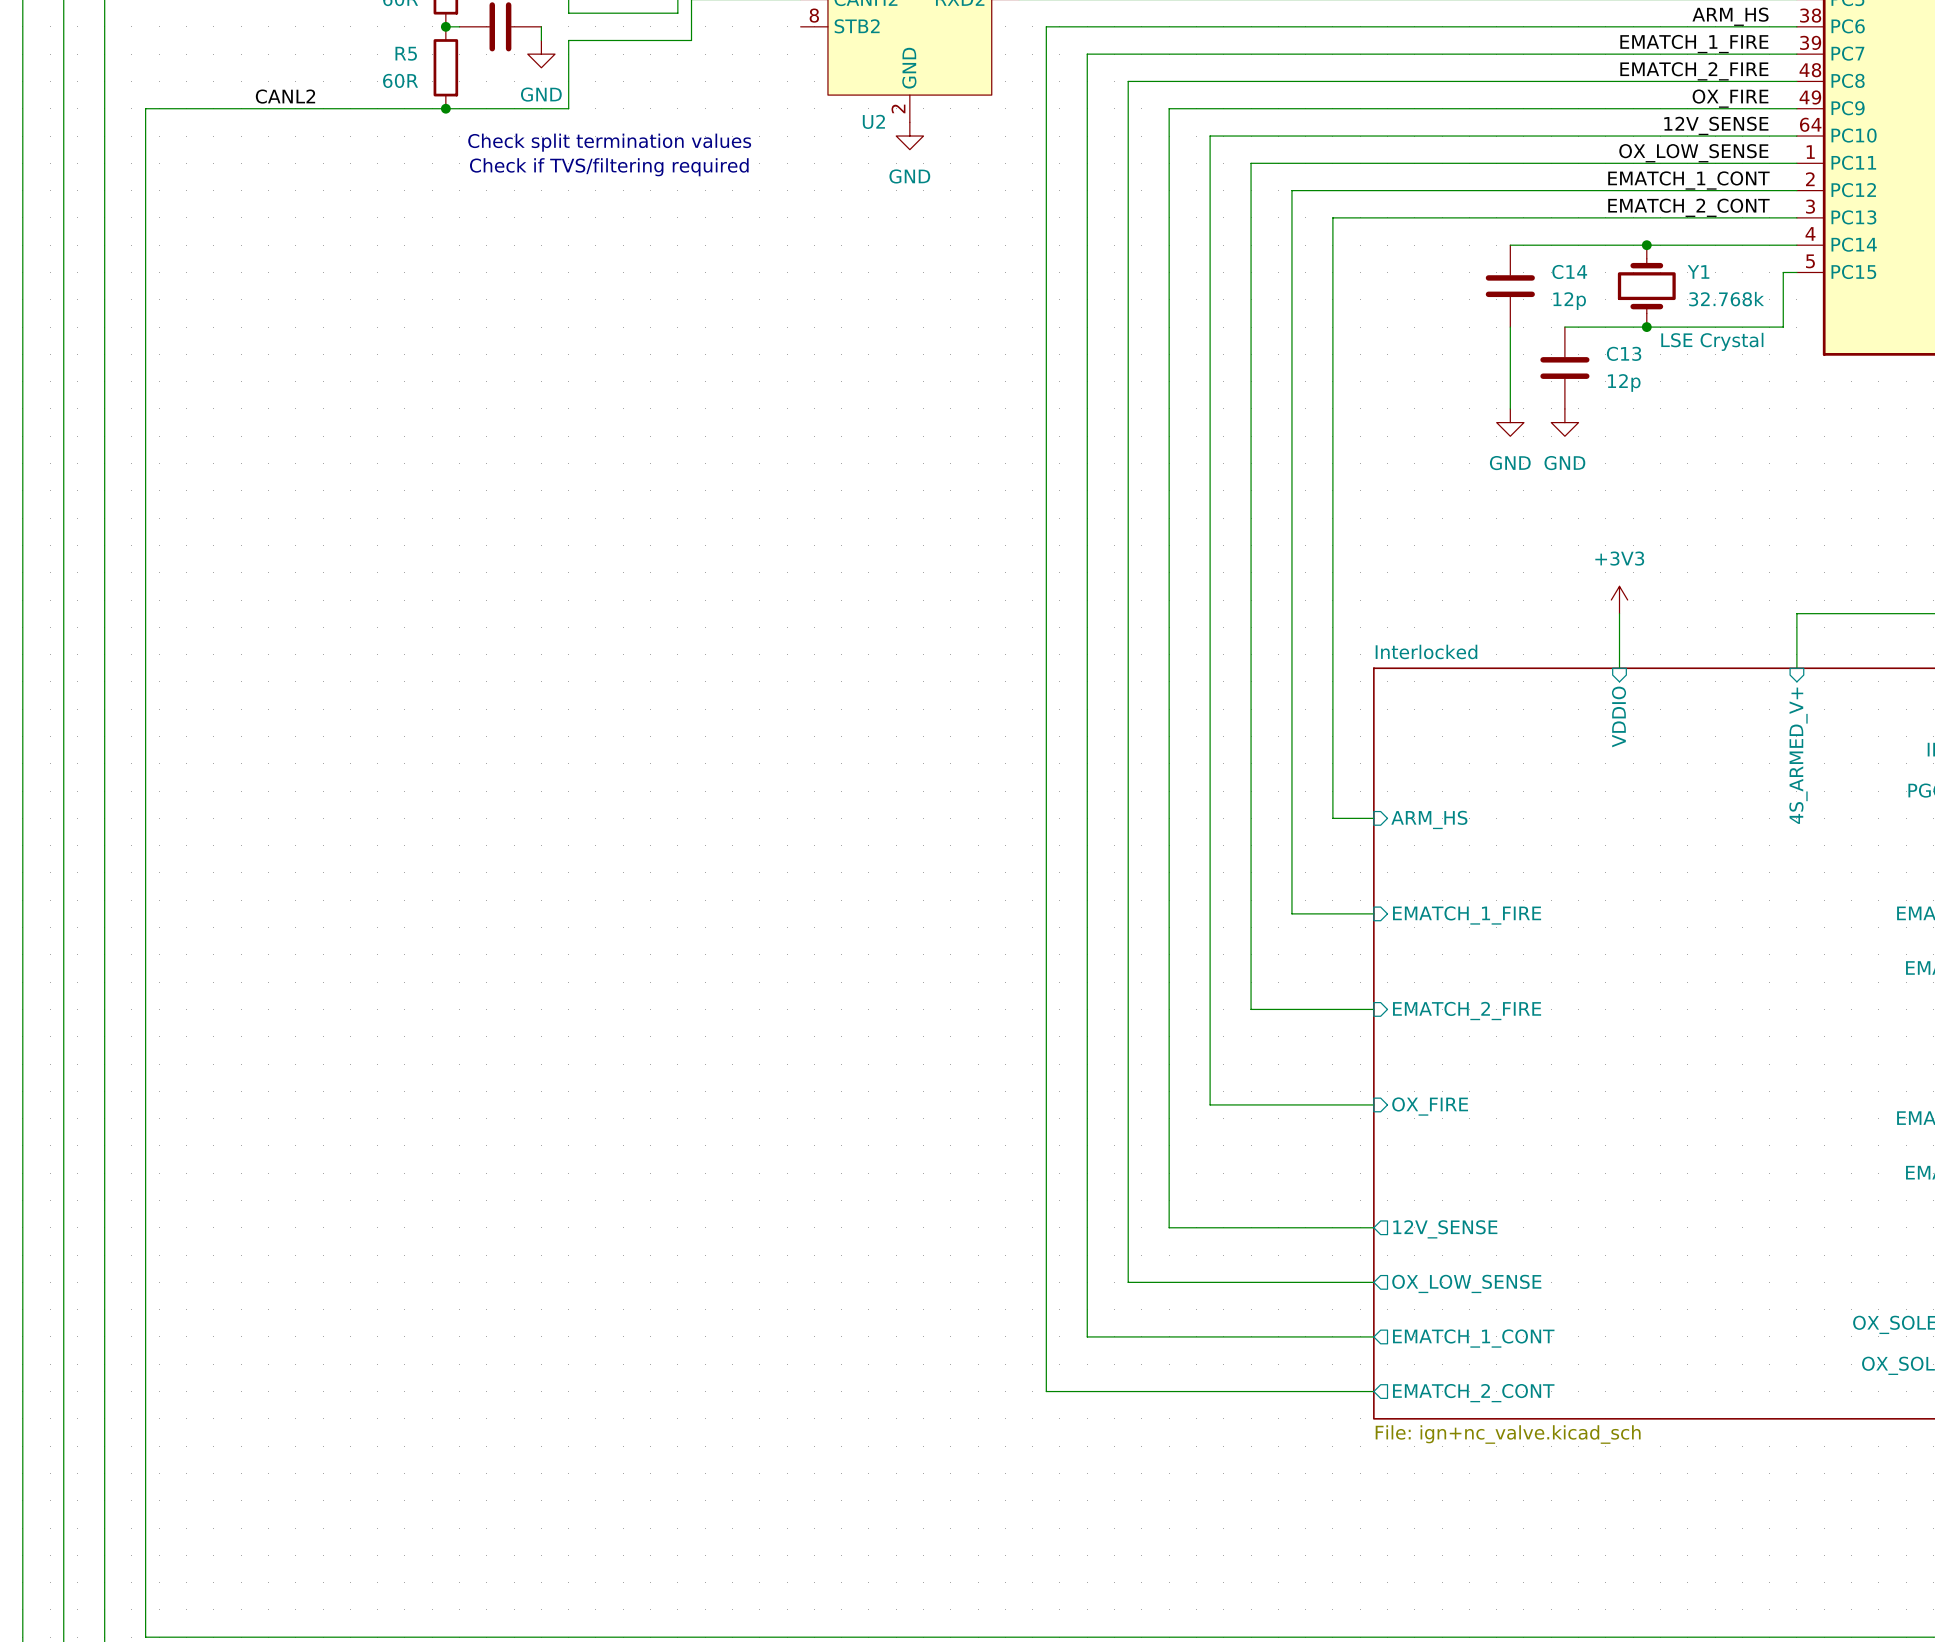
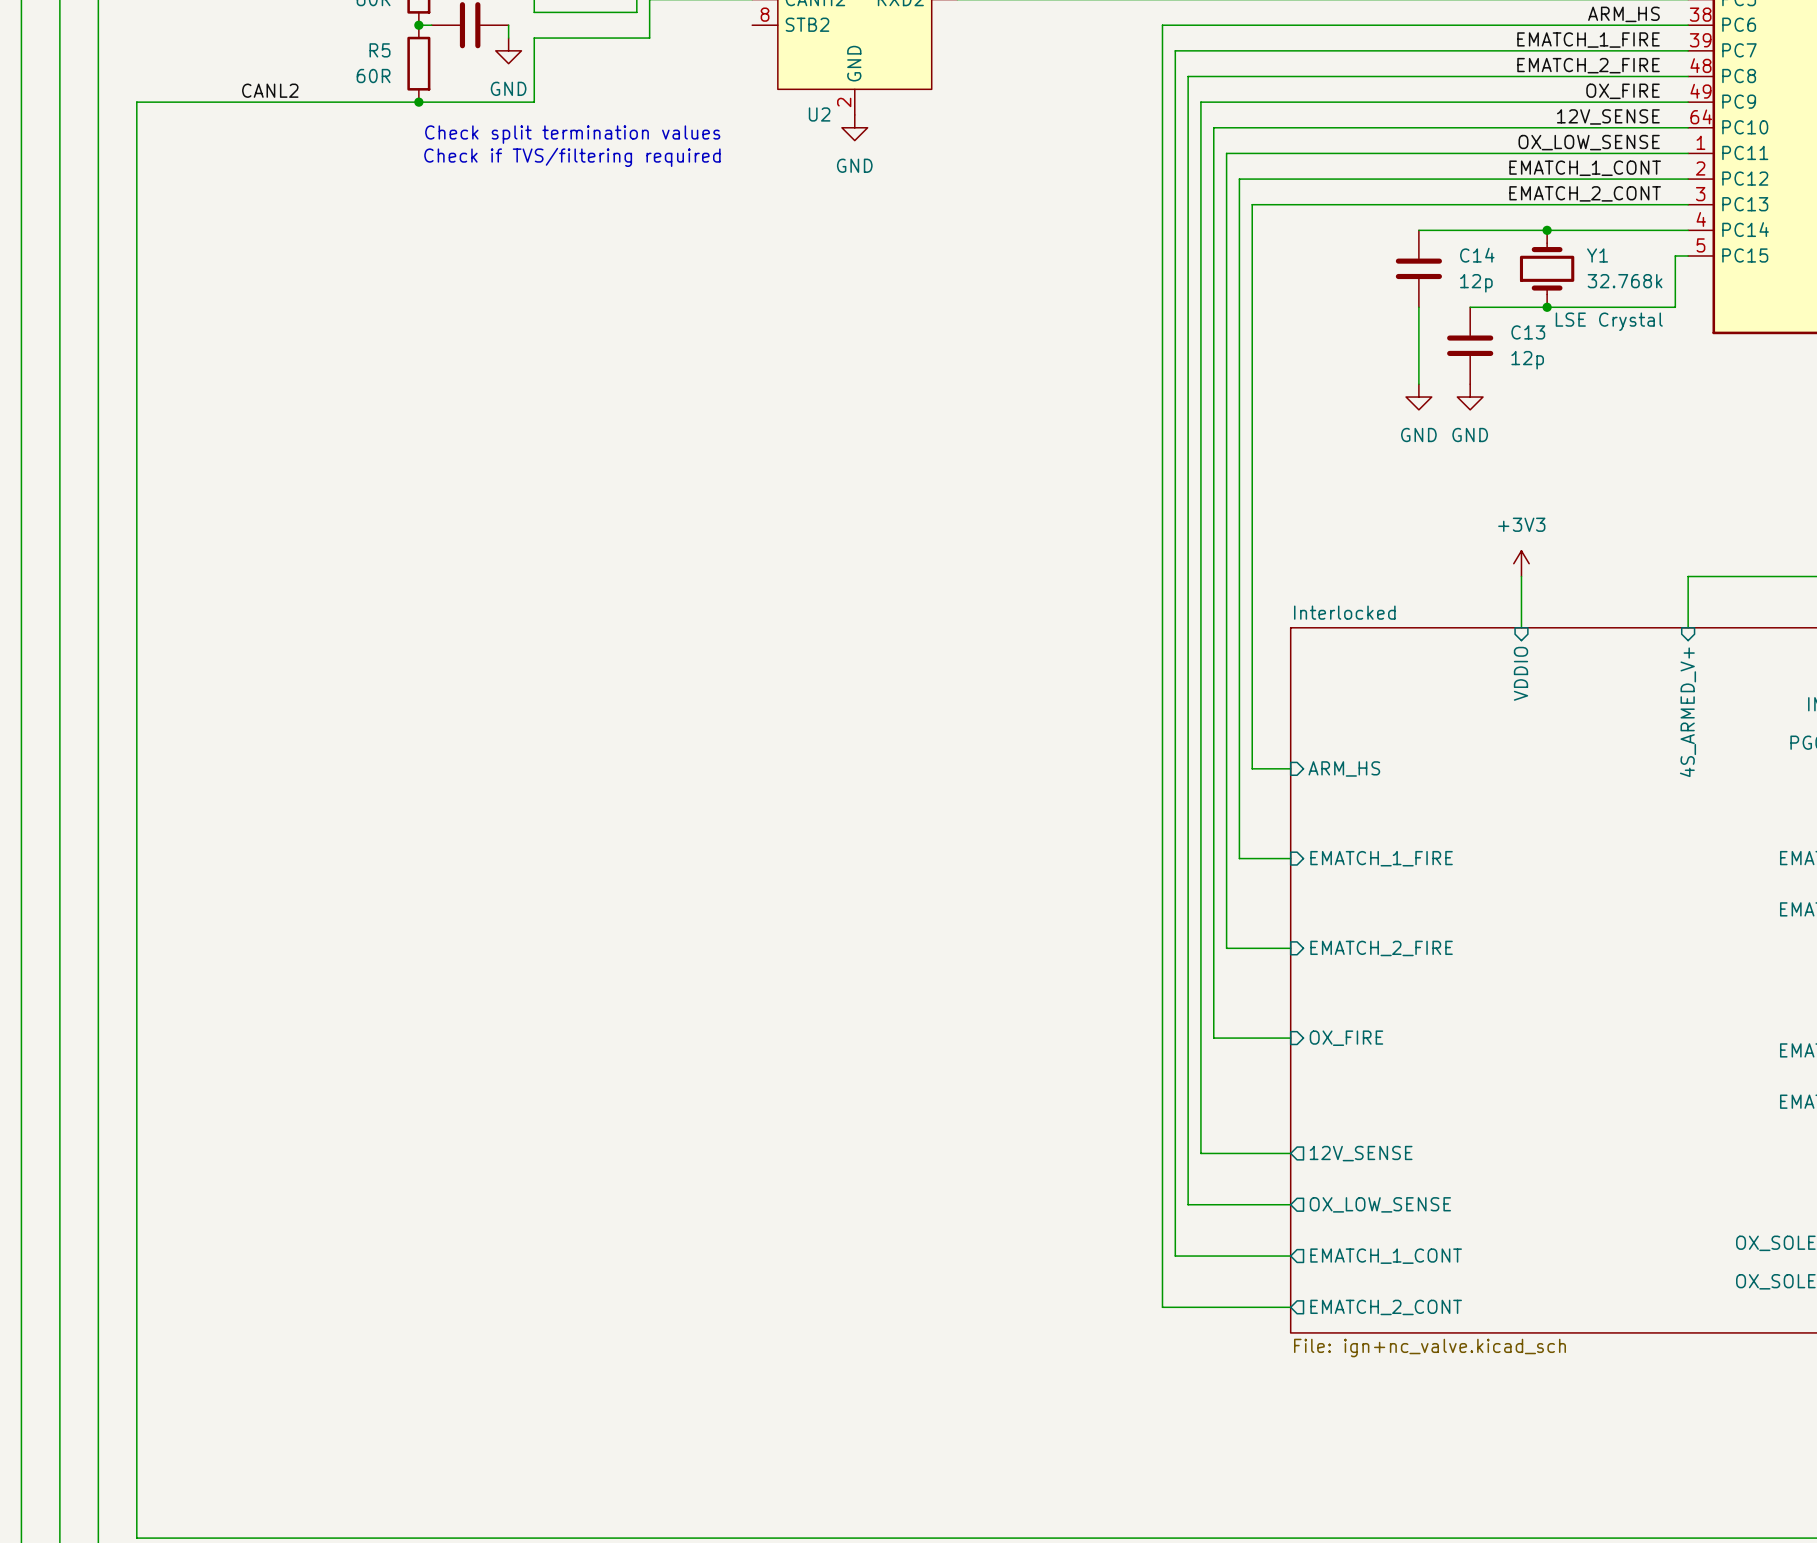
wire: (1237, 26) (1046, 26) (1046, 1391) (1237, 1391) -> (1162, 25) (1162, 1307)
wire: (1251, 54) (1087, 54) (1087, 1336) (1251, 1336) -> none
wire: (1264, 81) (1128, 81) (1128, 1282) (1264, 1282) -> (1188, 76) (1188, 1204)
wire: (1278, 108) (1169, 108) (1169, 1227) (1278, 1227) -> (1200, 102) (1200, 1153)
wire: (1291, 136) (1210, 136) (1210, 1104) (1291, 1104) -> none
wire: (1251, 163) (1305, 163) -> (1175, 153) (1175, 50)
wire: none -> (1226, 153) (1226, 948)
wire: (1291, 190) (1319, 190) -> (1213, 179) (1213, 127)
wire: none -> (1239, 179) (1239, 858)
wire: (1291, 913) (1319, 913) -> (1213, 858) (1213, 1038)
wire: (1251, 1009) (1305, 1009) -> (1175, 948) (1175, 1256)

